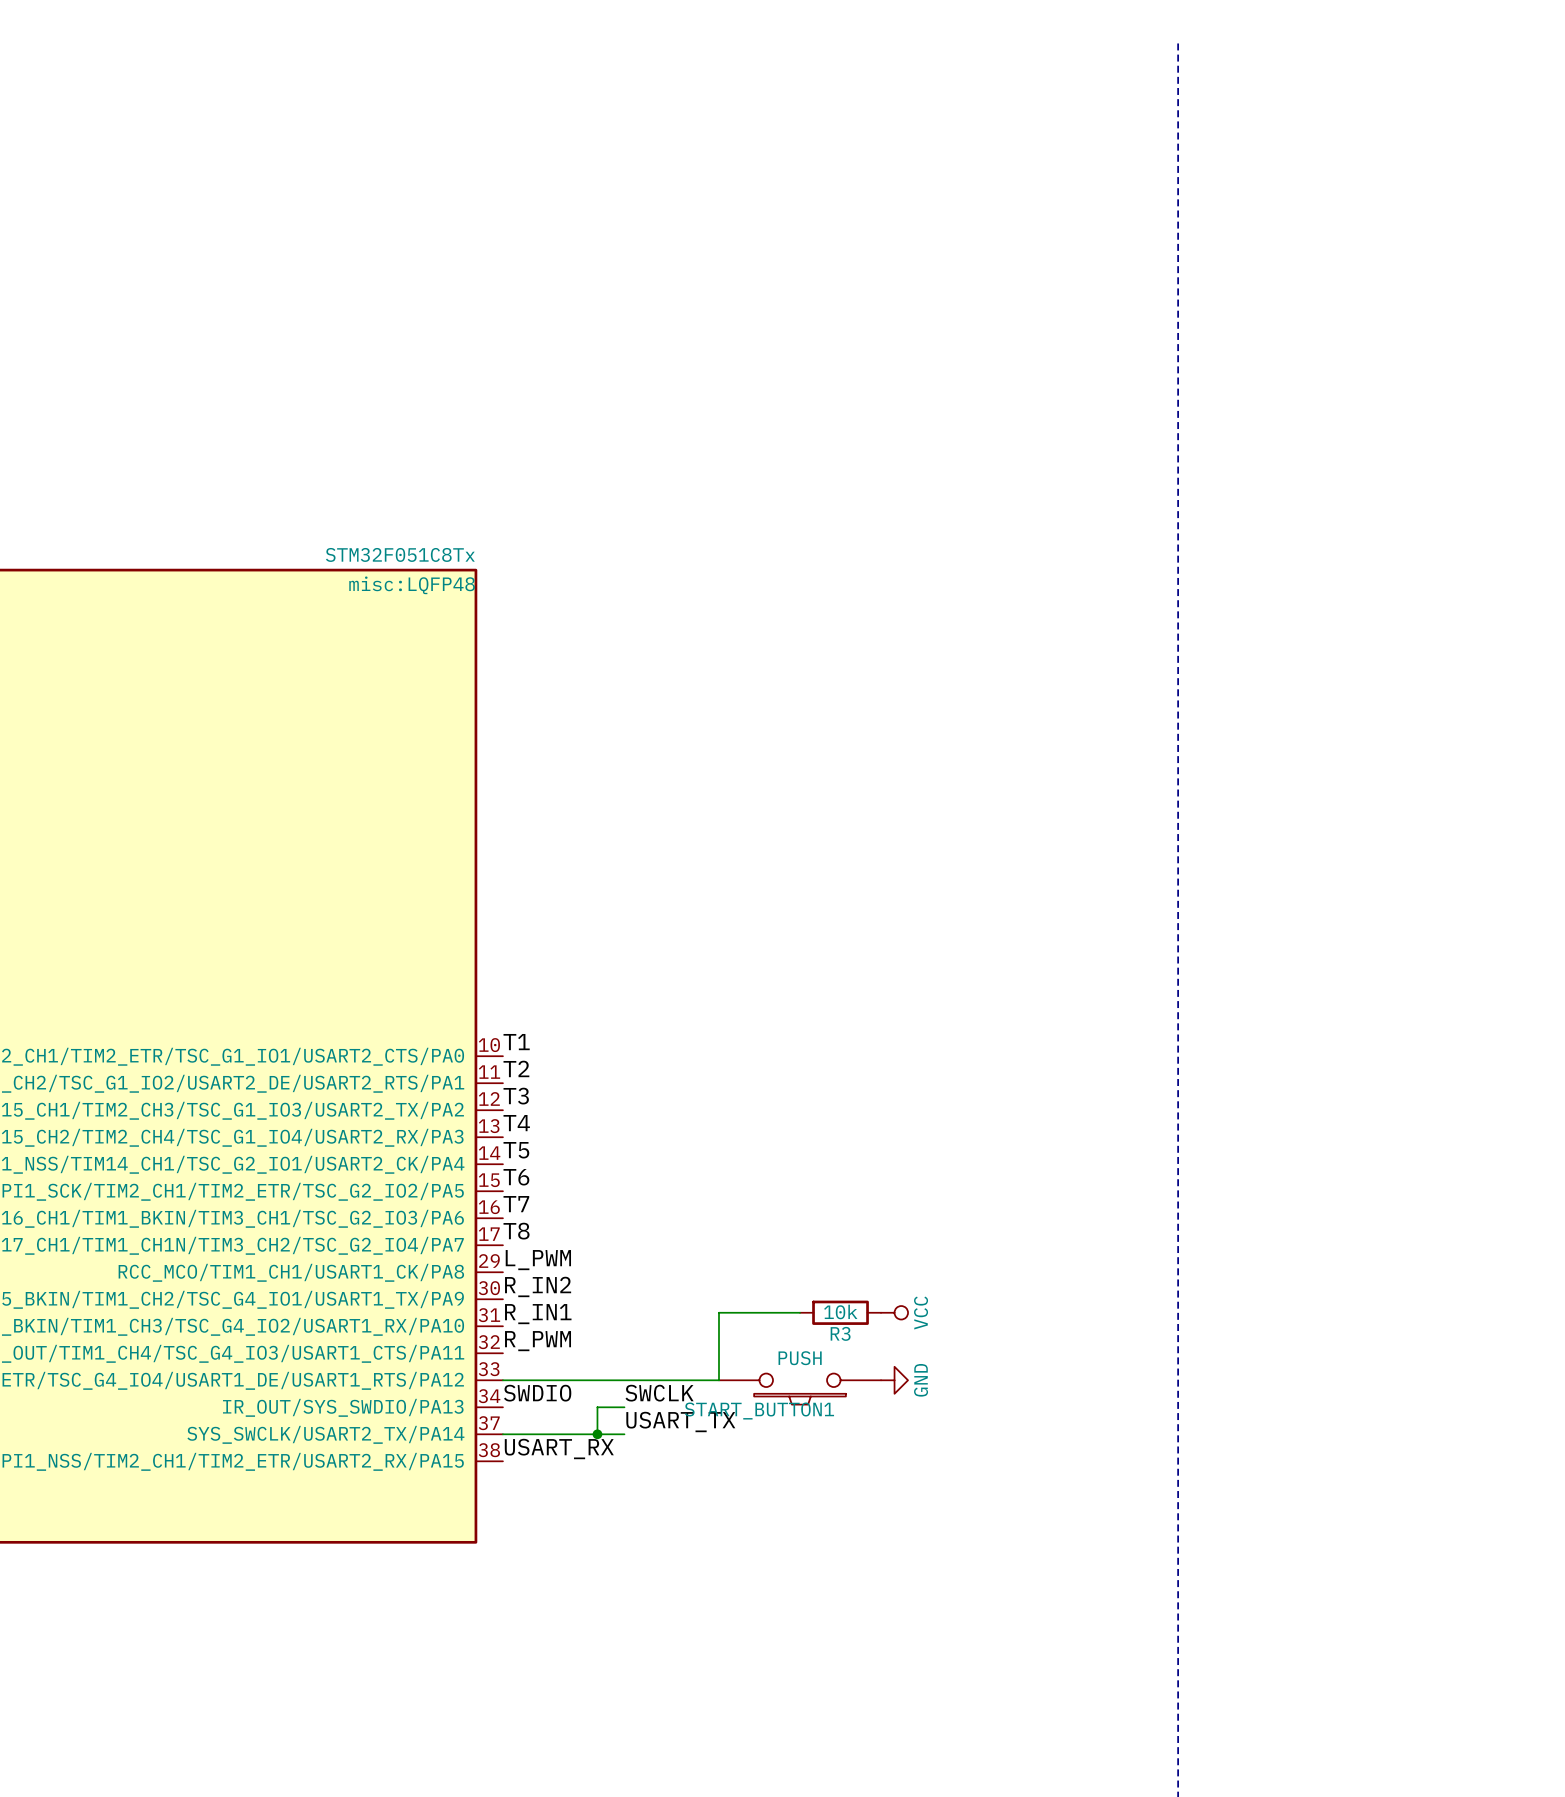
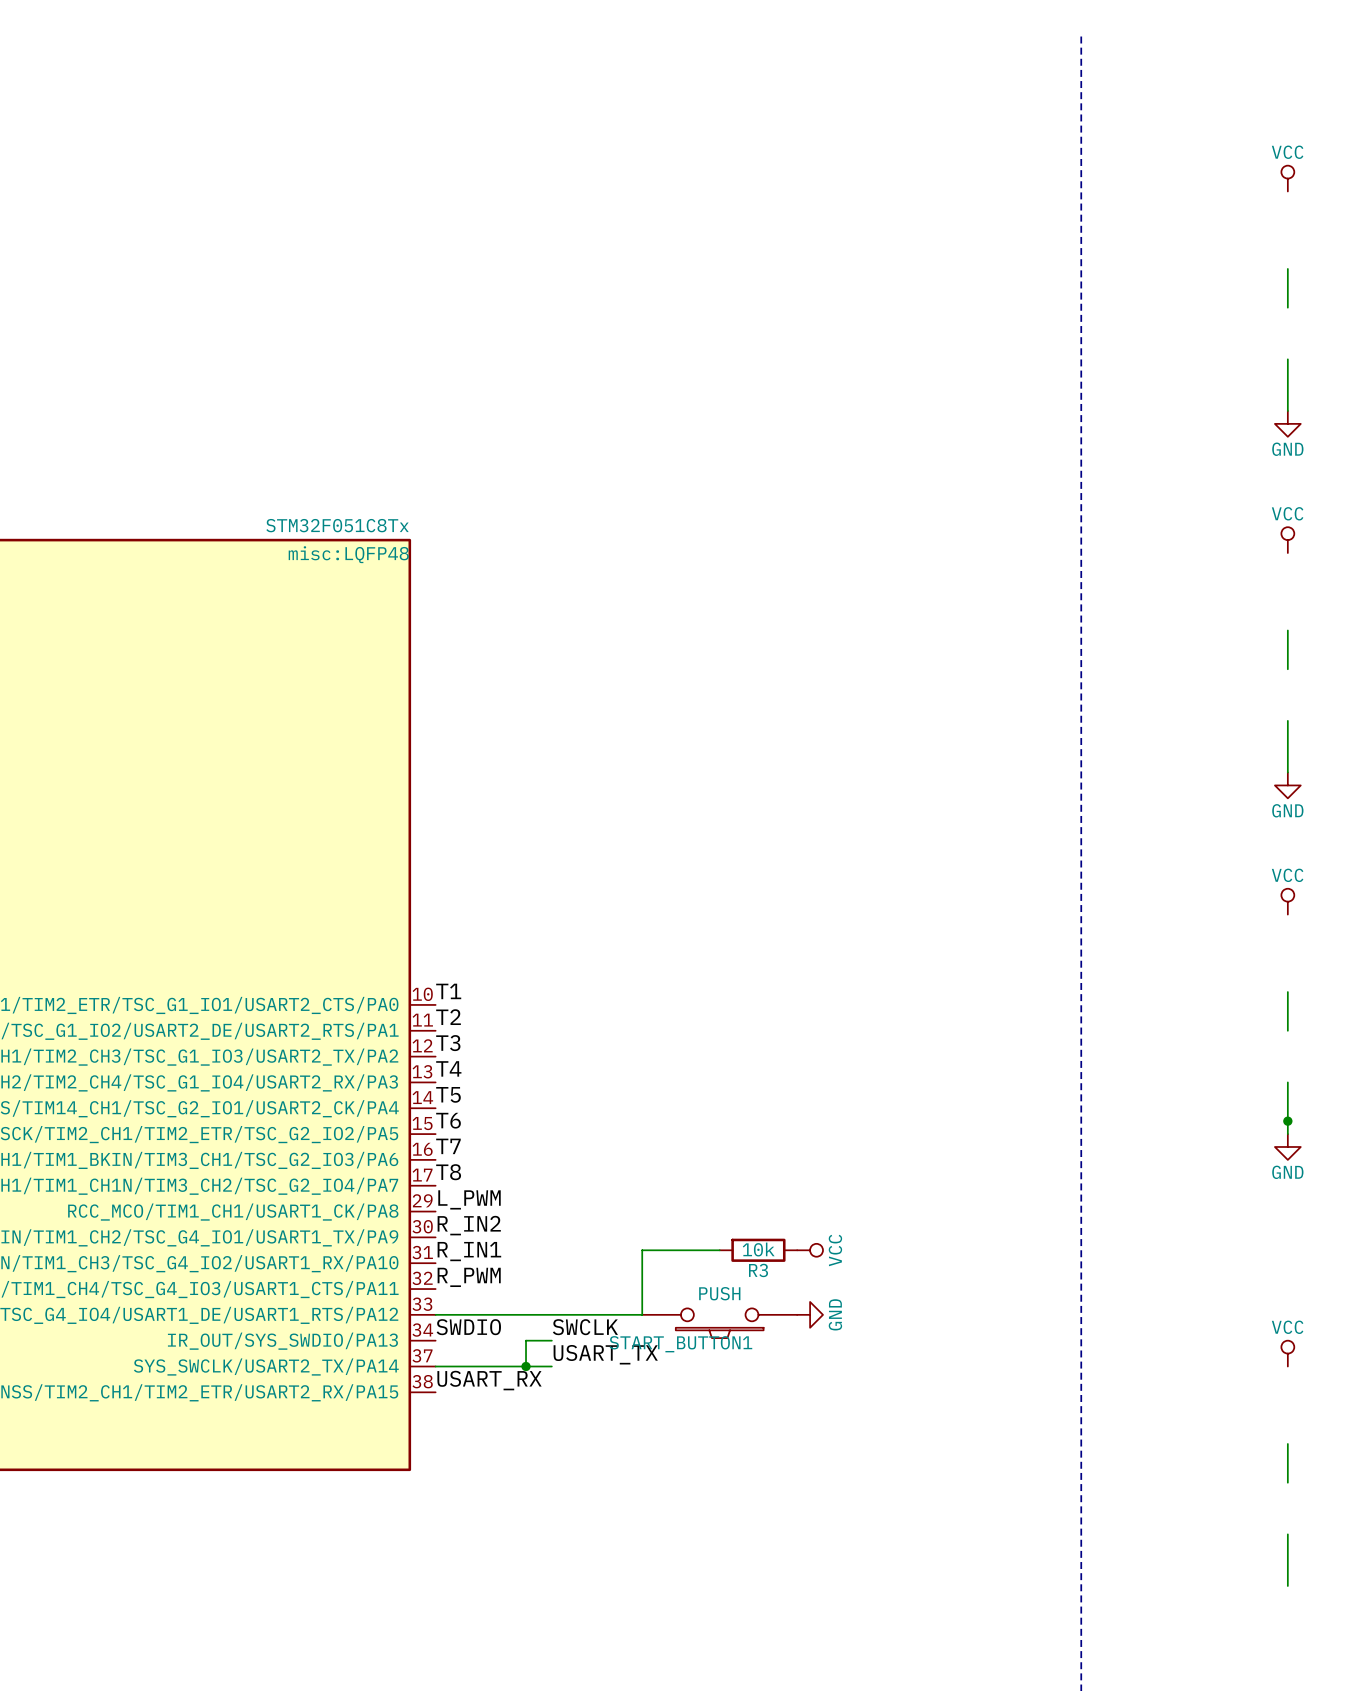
power symbol: none -> VCC (1287, 178)
wire: none -> (1287, 268) (1287, 307)
wire: none -> (1287, 359) (1287, 410)
power symbol: none -> GND (1287, 423)
power symbol: none -> VCC (1287, 540)
wire: none -> (1287, 630) (1287, 669)
wire: none -> (1287, 720) (1287, 772)
power symbol: none -> GND (1287, 785)
power symbol: none -> VCC (1287, 901)
wire: none -> (1287, 992) (1287, 1030)
wire: none -> (1287, 1082) (1287, 1134)
junction: none -> (1287, 1121)
power symbol: none -> GND (1287, 1146)
power symbol: none -> VCC (1287, 1353)
wire: none -> (1287, 1443) (1287, 1482)
wire: none -> (1287, 1534) (1287, 1586)

